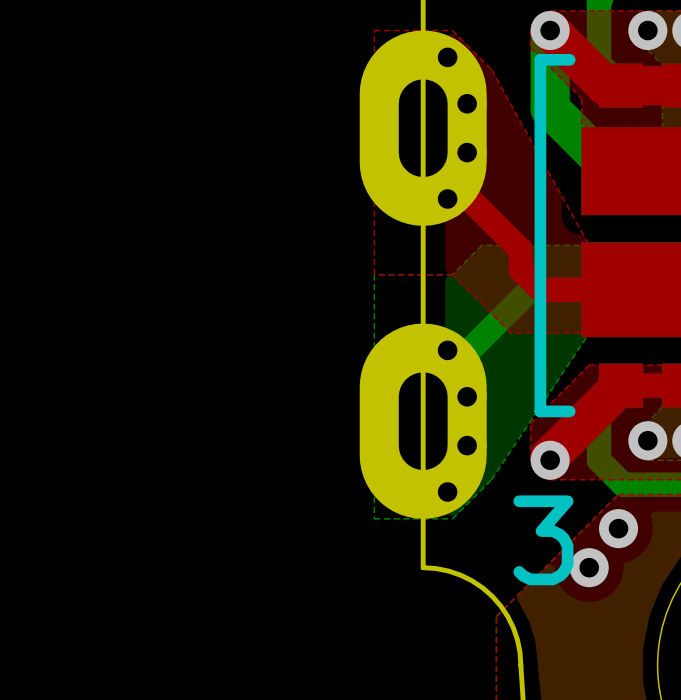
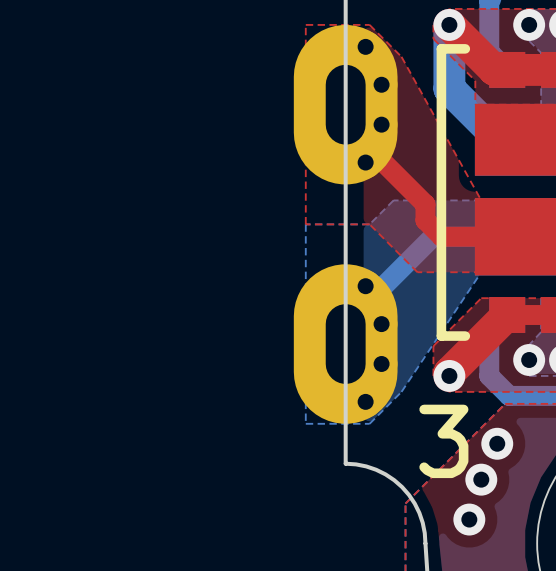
via: (618, 528) -> none
via: none -> (497, 443)
via: (589, 567) -> none
via: none -> (481, 479)
via: none -> (469, 519)

